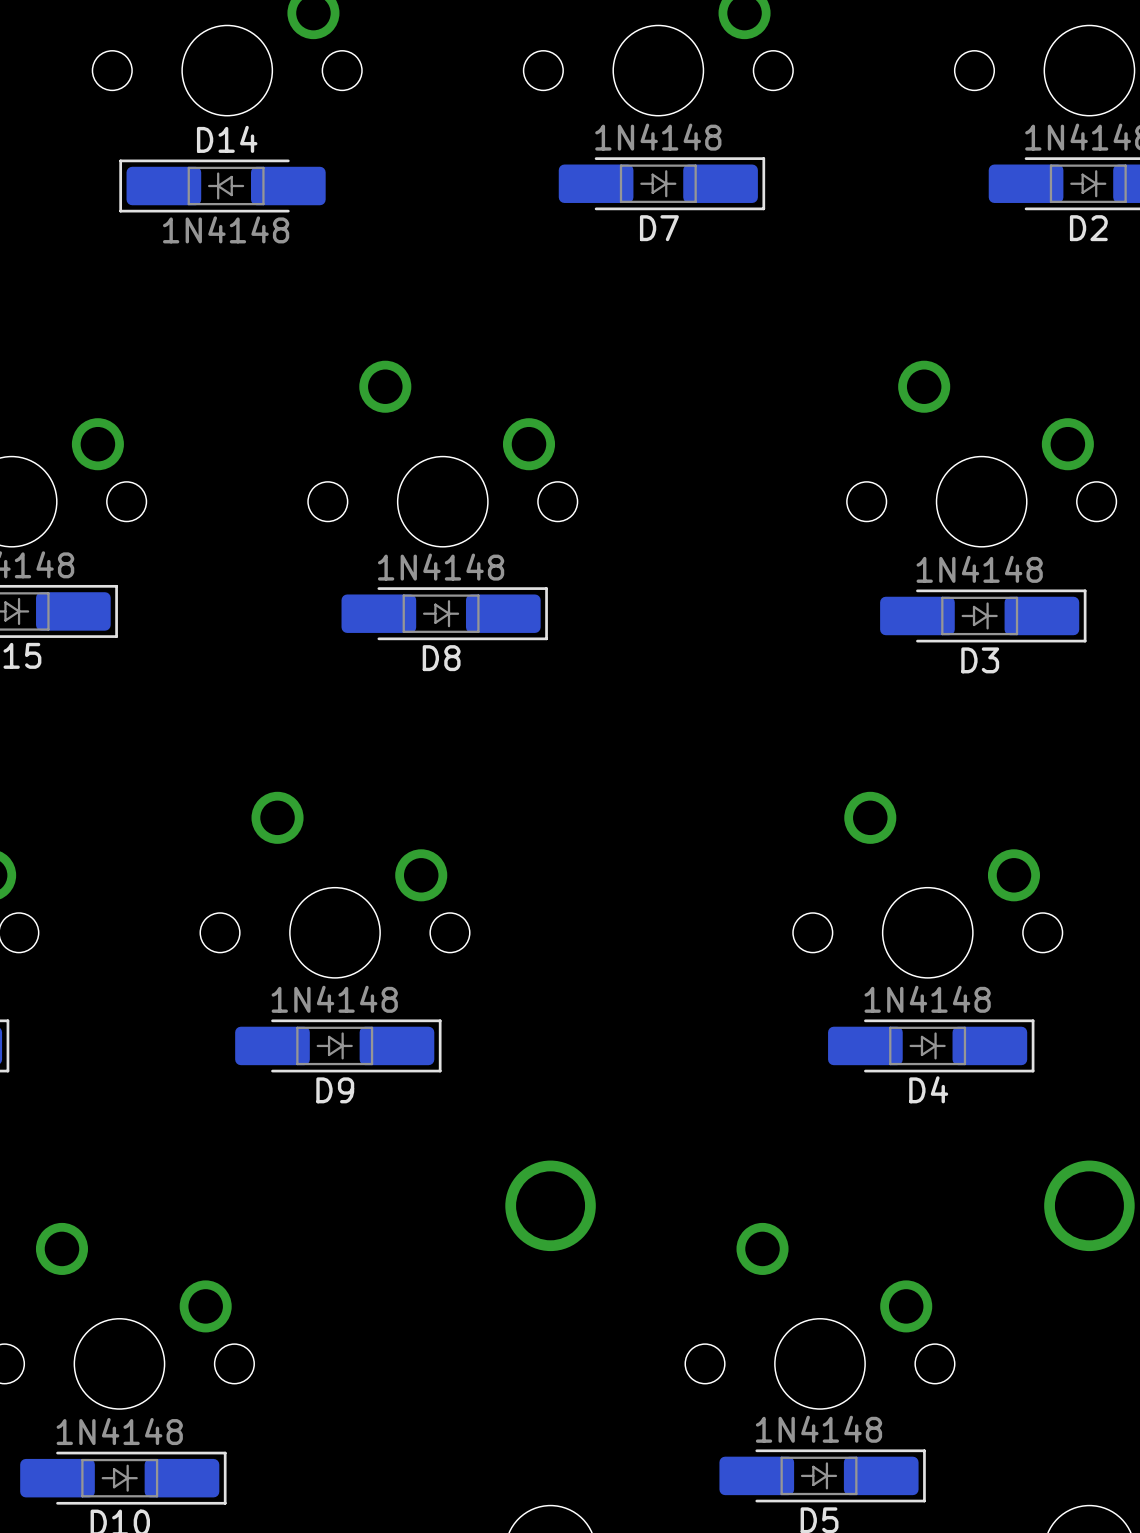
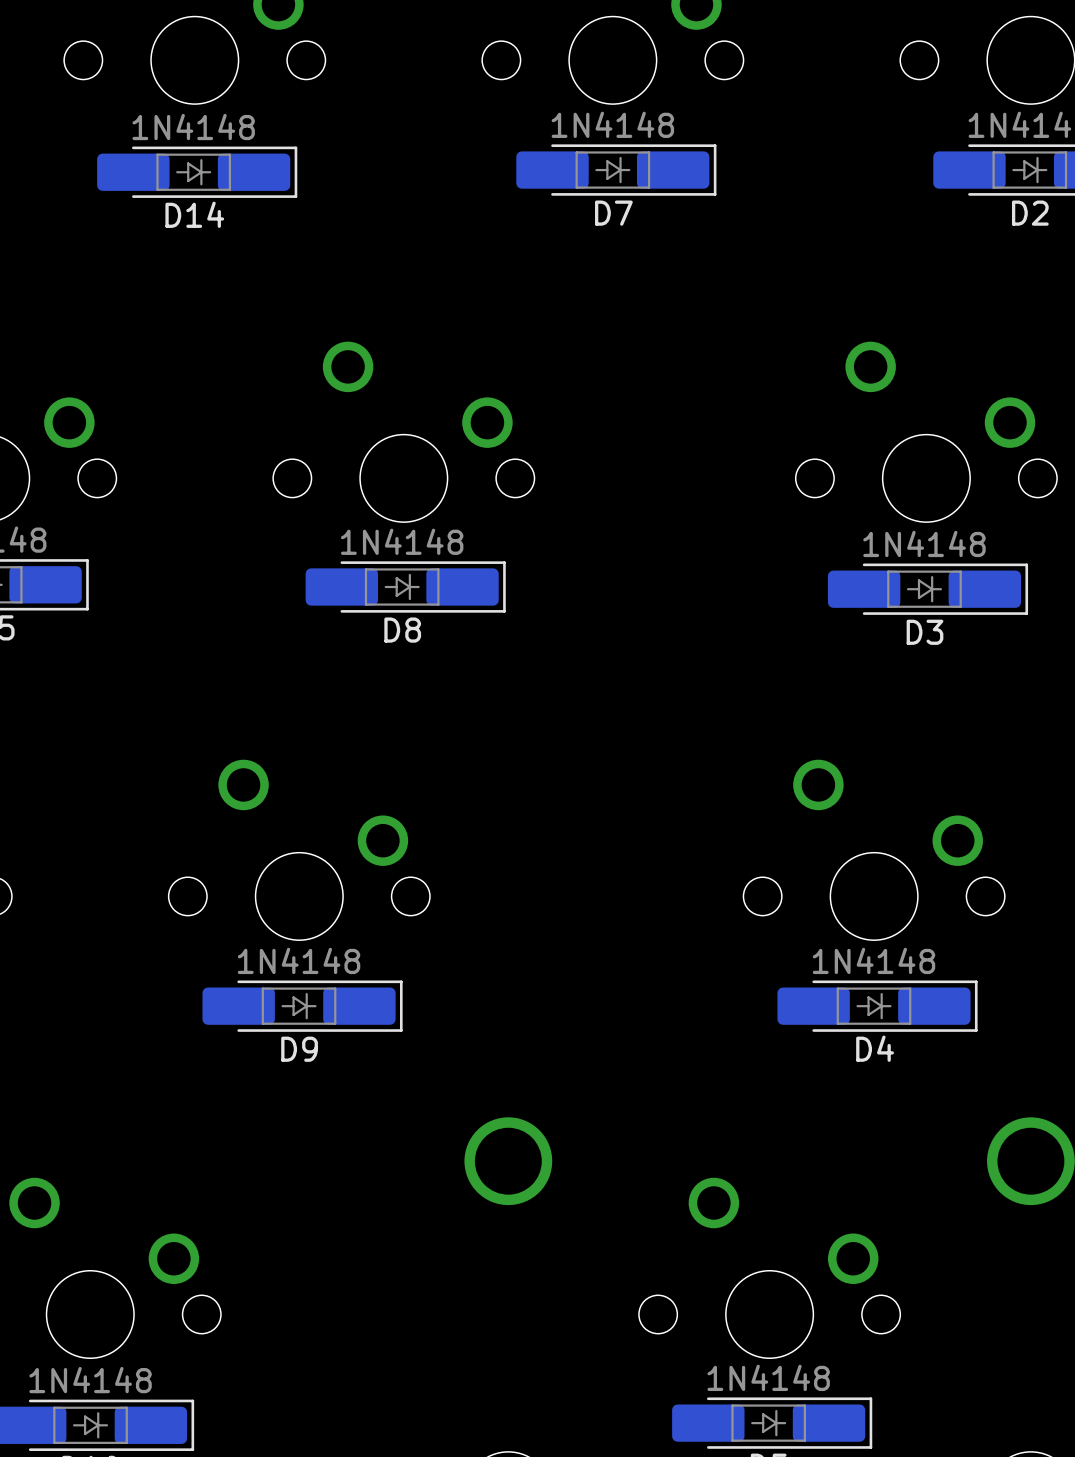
D14 rotation: 0° (222, 186) -> 180° (197, 172)

